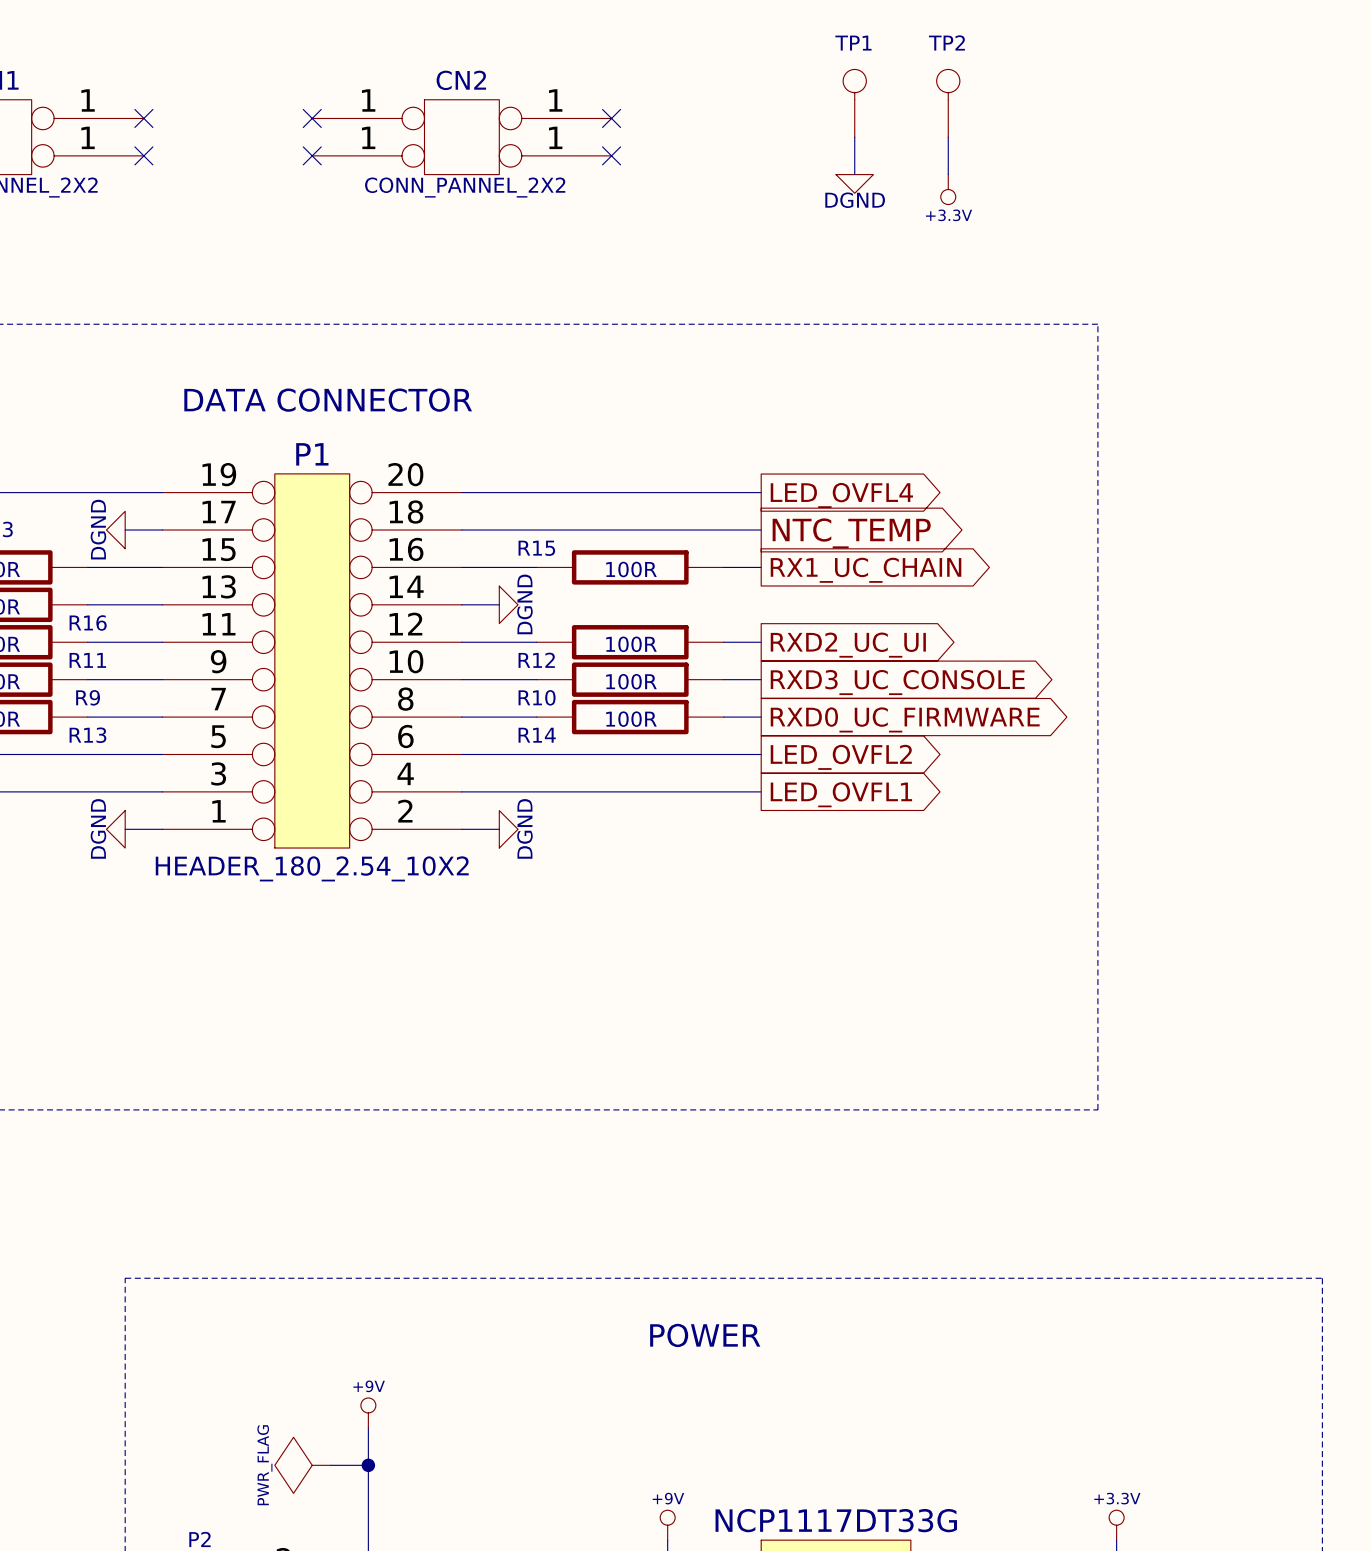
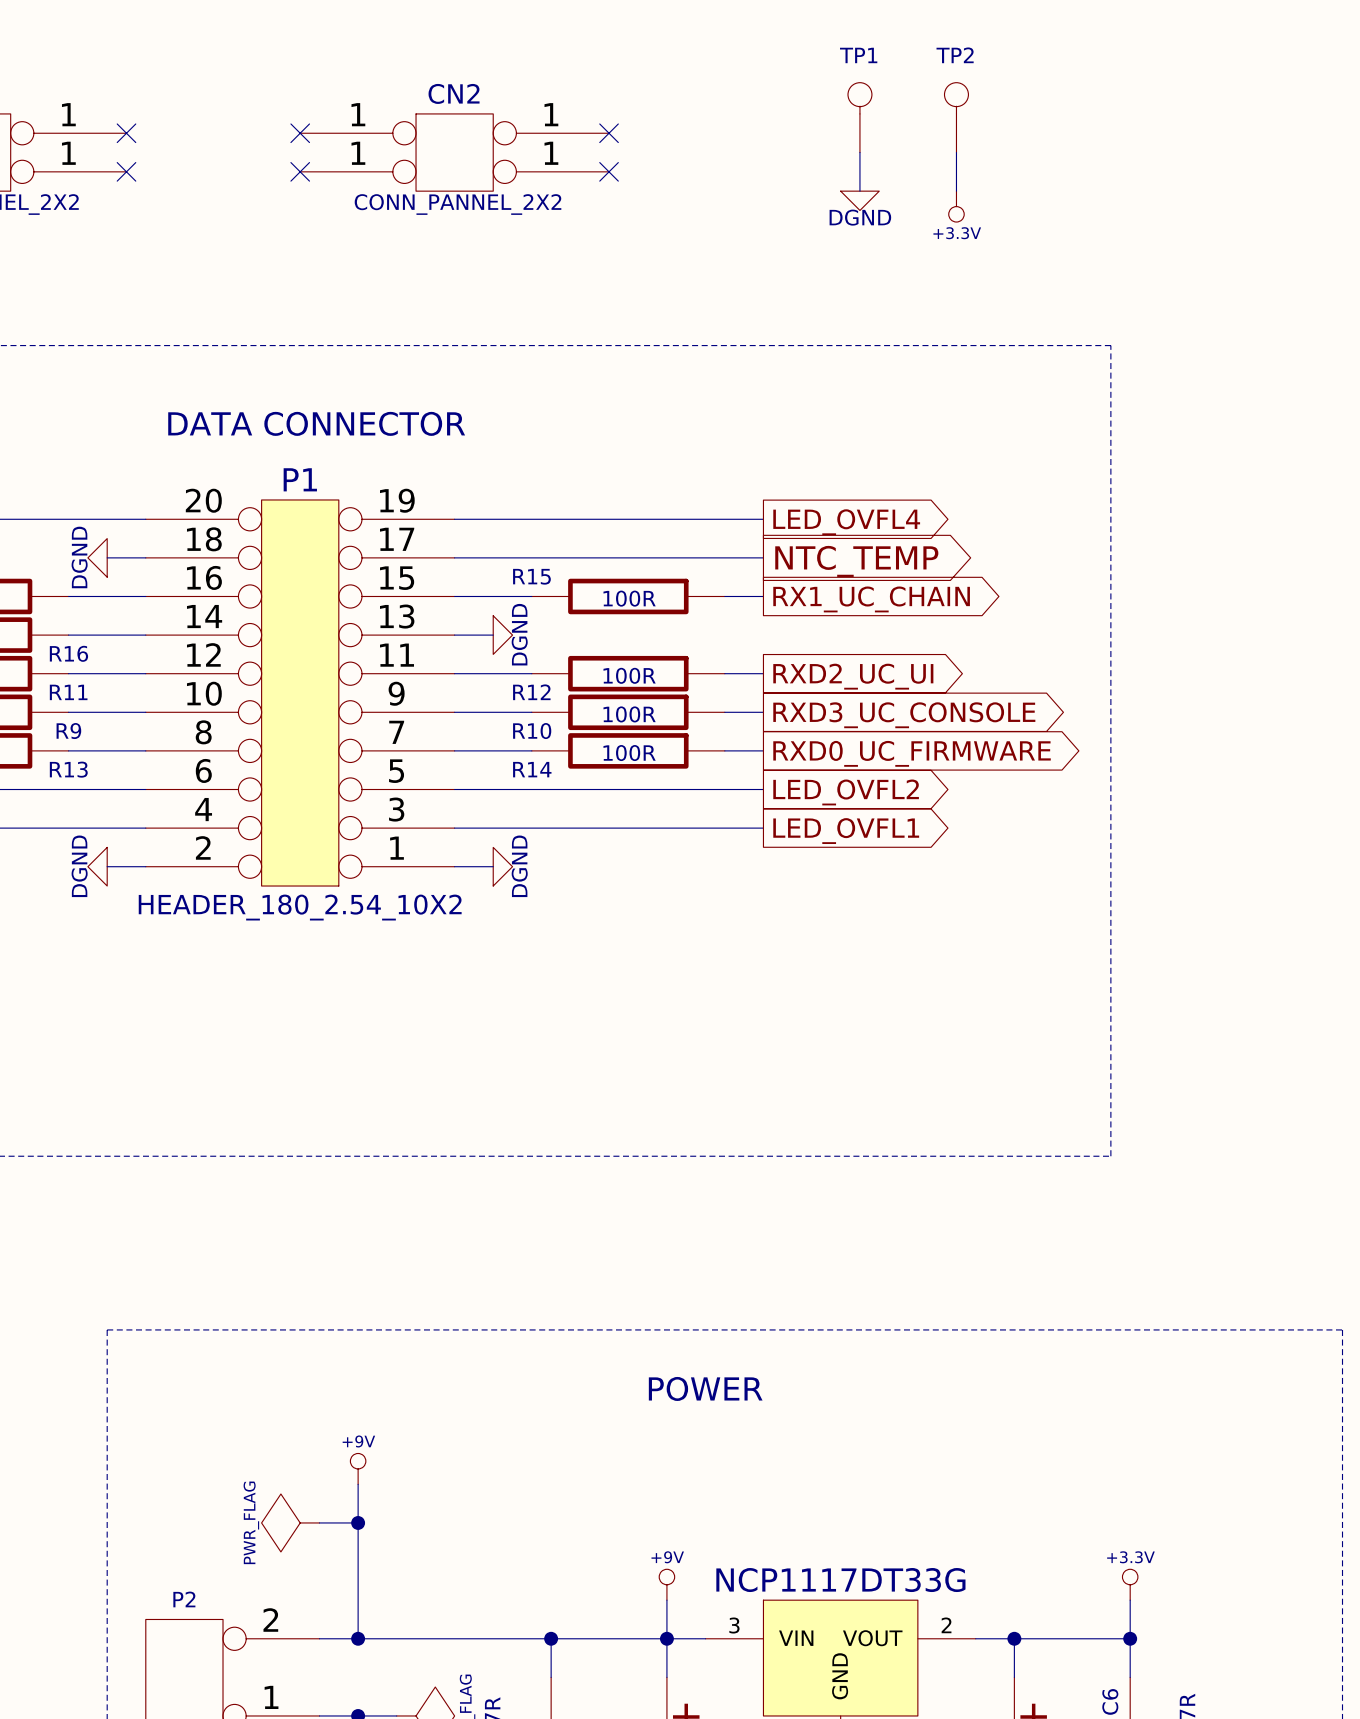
P1 flip: as is (312, 660) -> left-right (300, 692)

